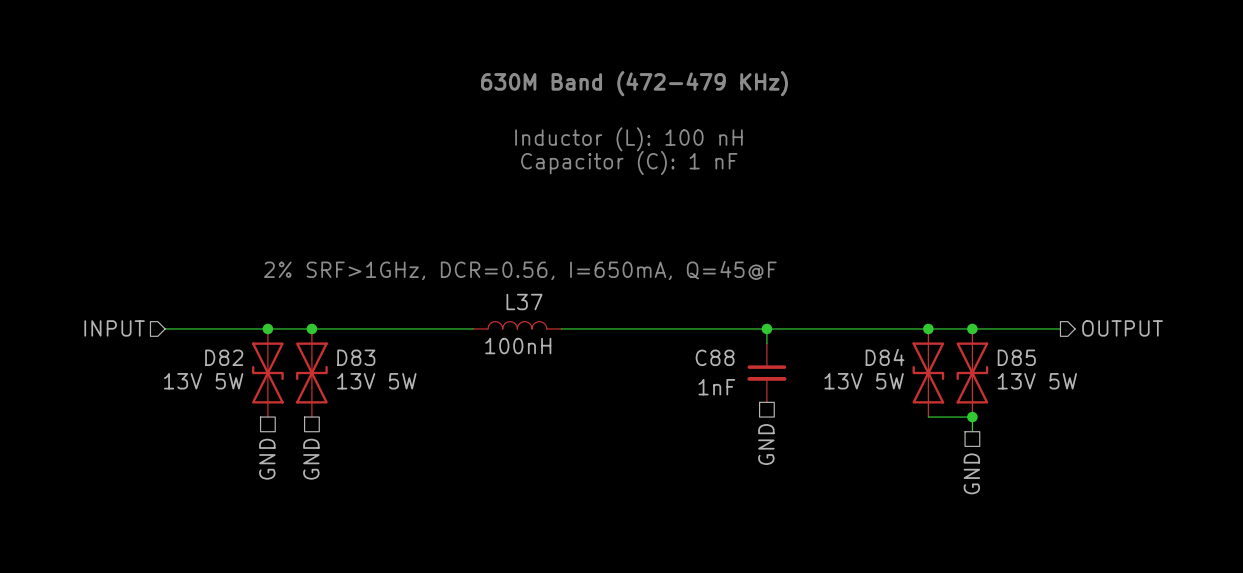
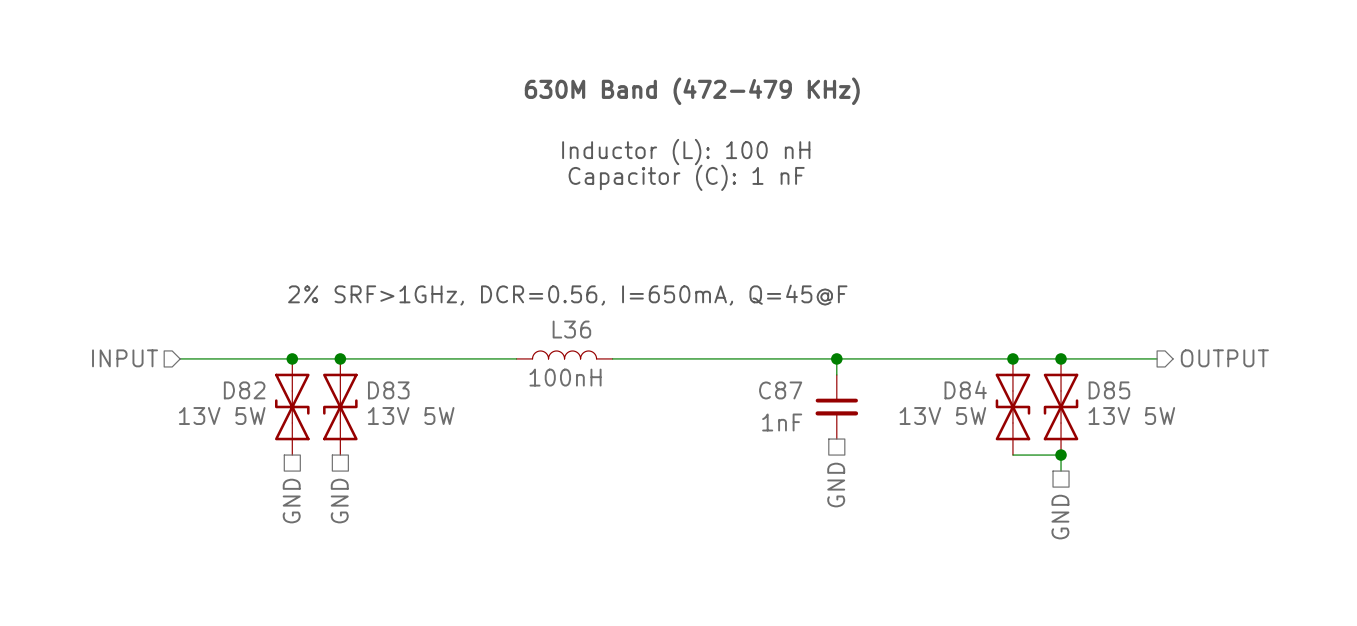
L37 name: L37 (524, 302) -> L36 (571, 329)
C88 name: C88 (715, 357) -> C87 (780, 390)

